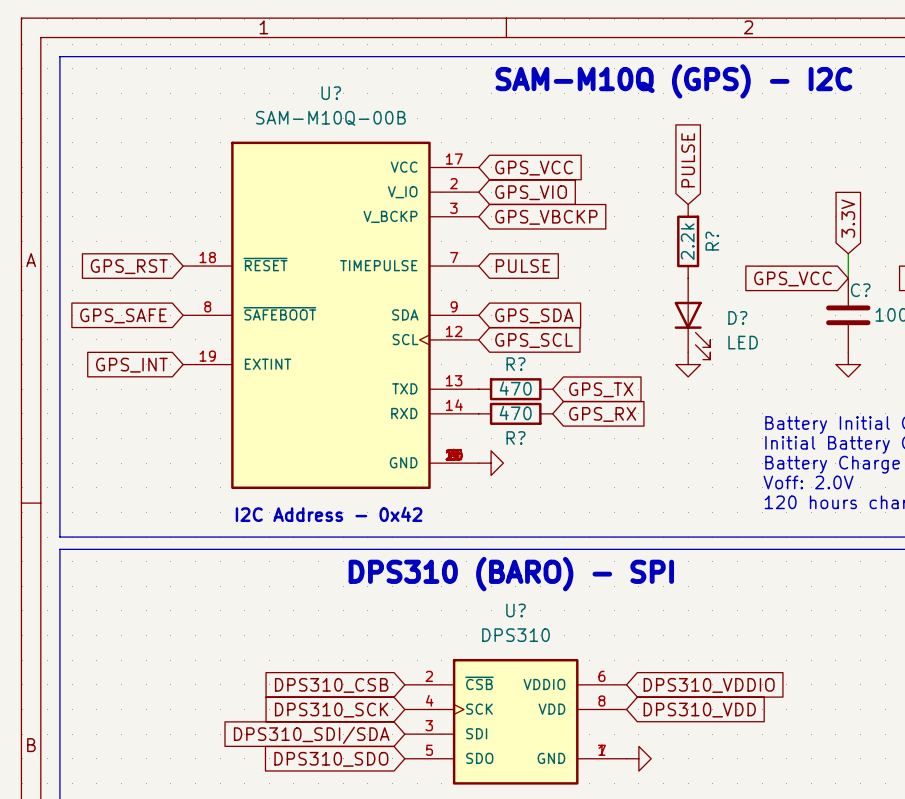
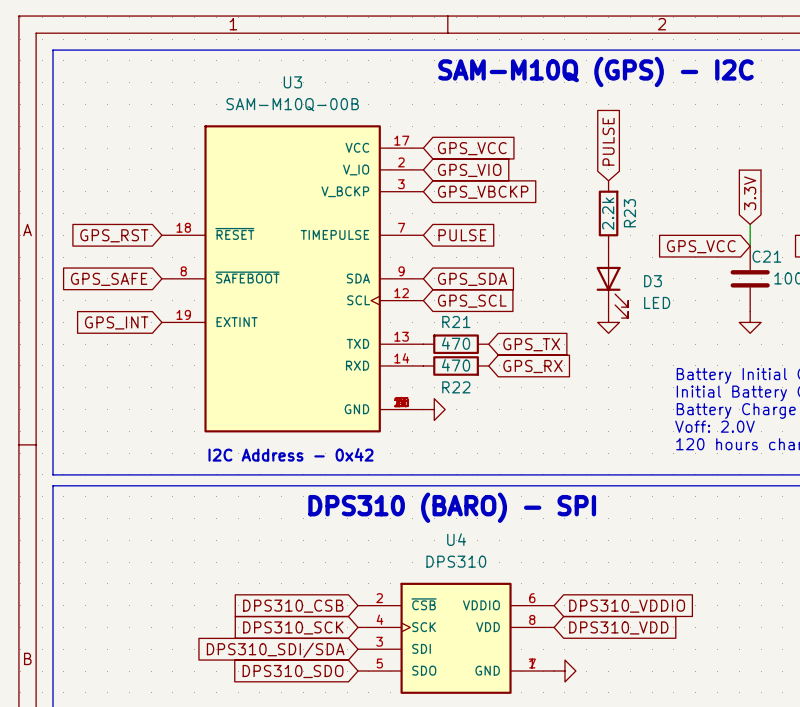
U? name: U? (331, 93) -> U3 (292, 82)
R? name: R? (712, 241) -> R23 (629, 213)
C? name: C? (860, 290) -> C21 (766, 256)
D? name: D? (737, 317) -> D3 (653, 281)
R? name: R? (516, 364) -> R21 (456, 322)
R? name: R? (516, 438) -> R22 (456, 387)
U? name: U? (516, 610) -> U4 (456, 539)

